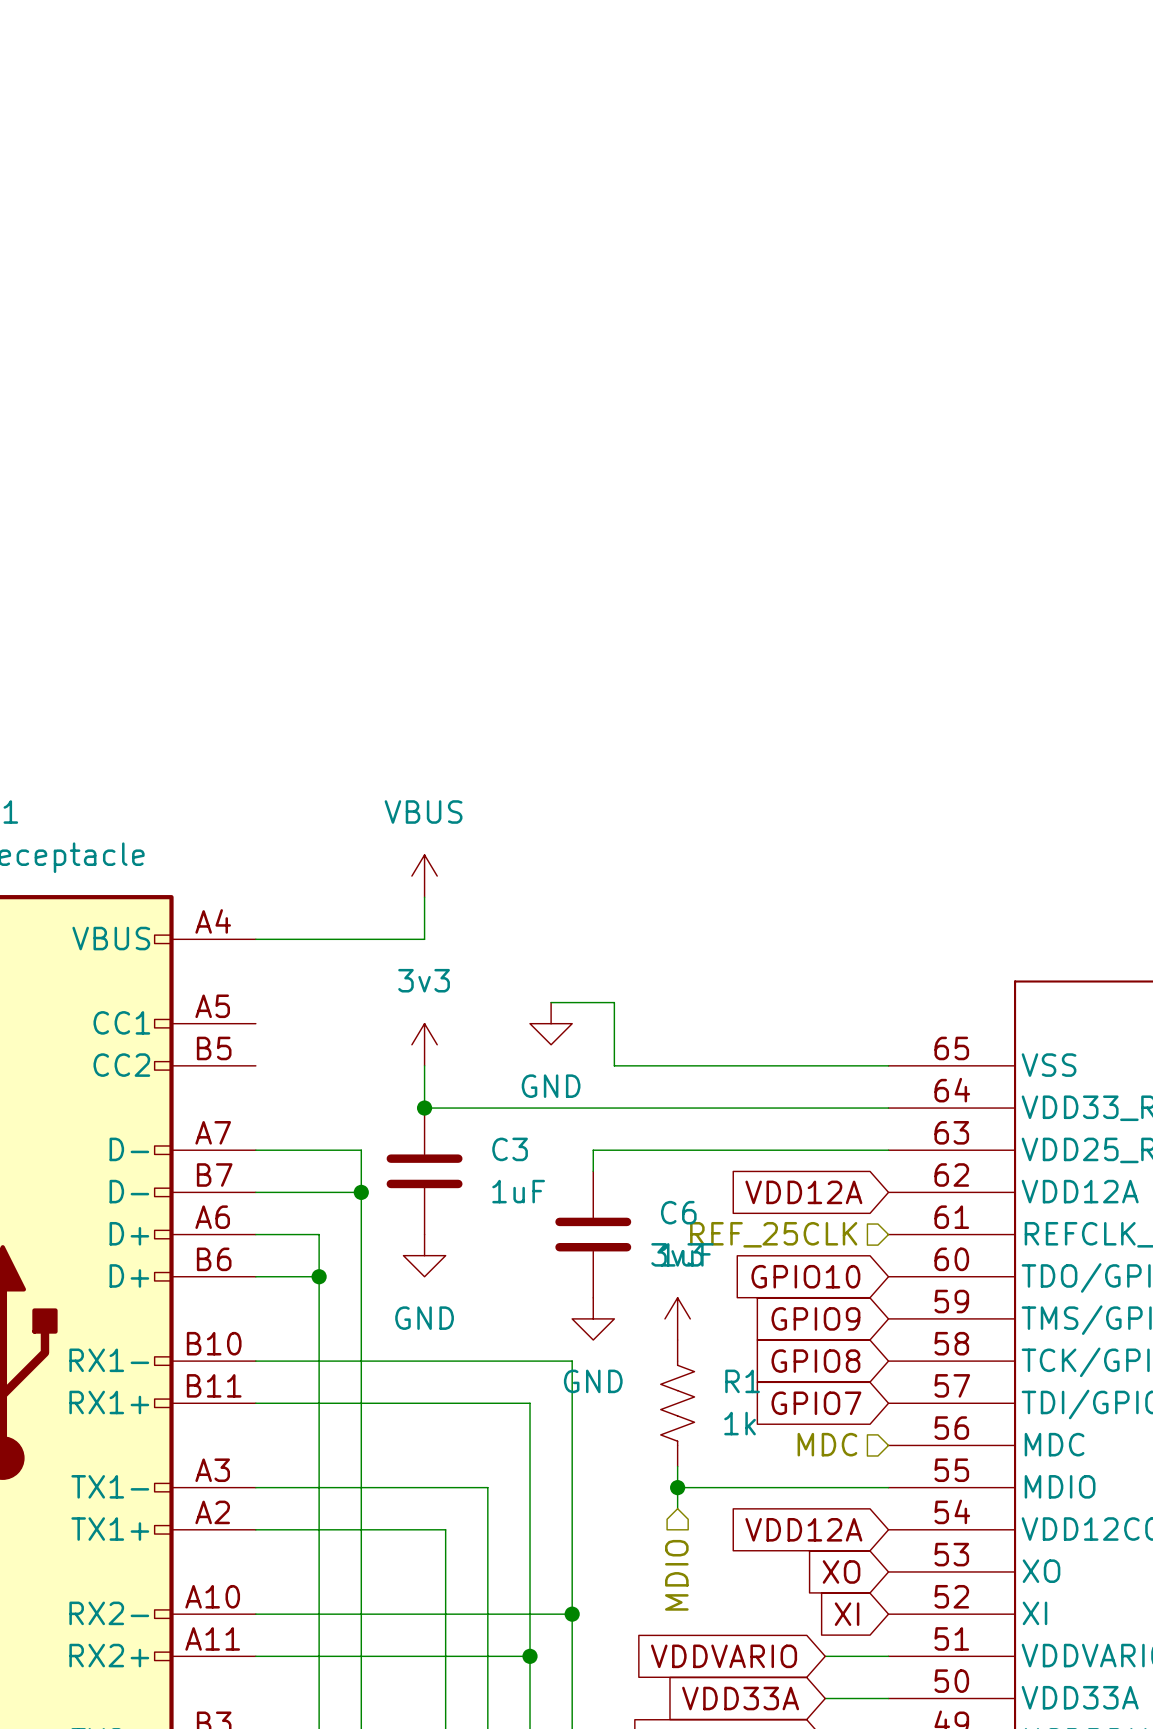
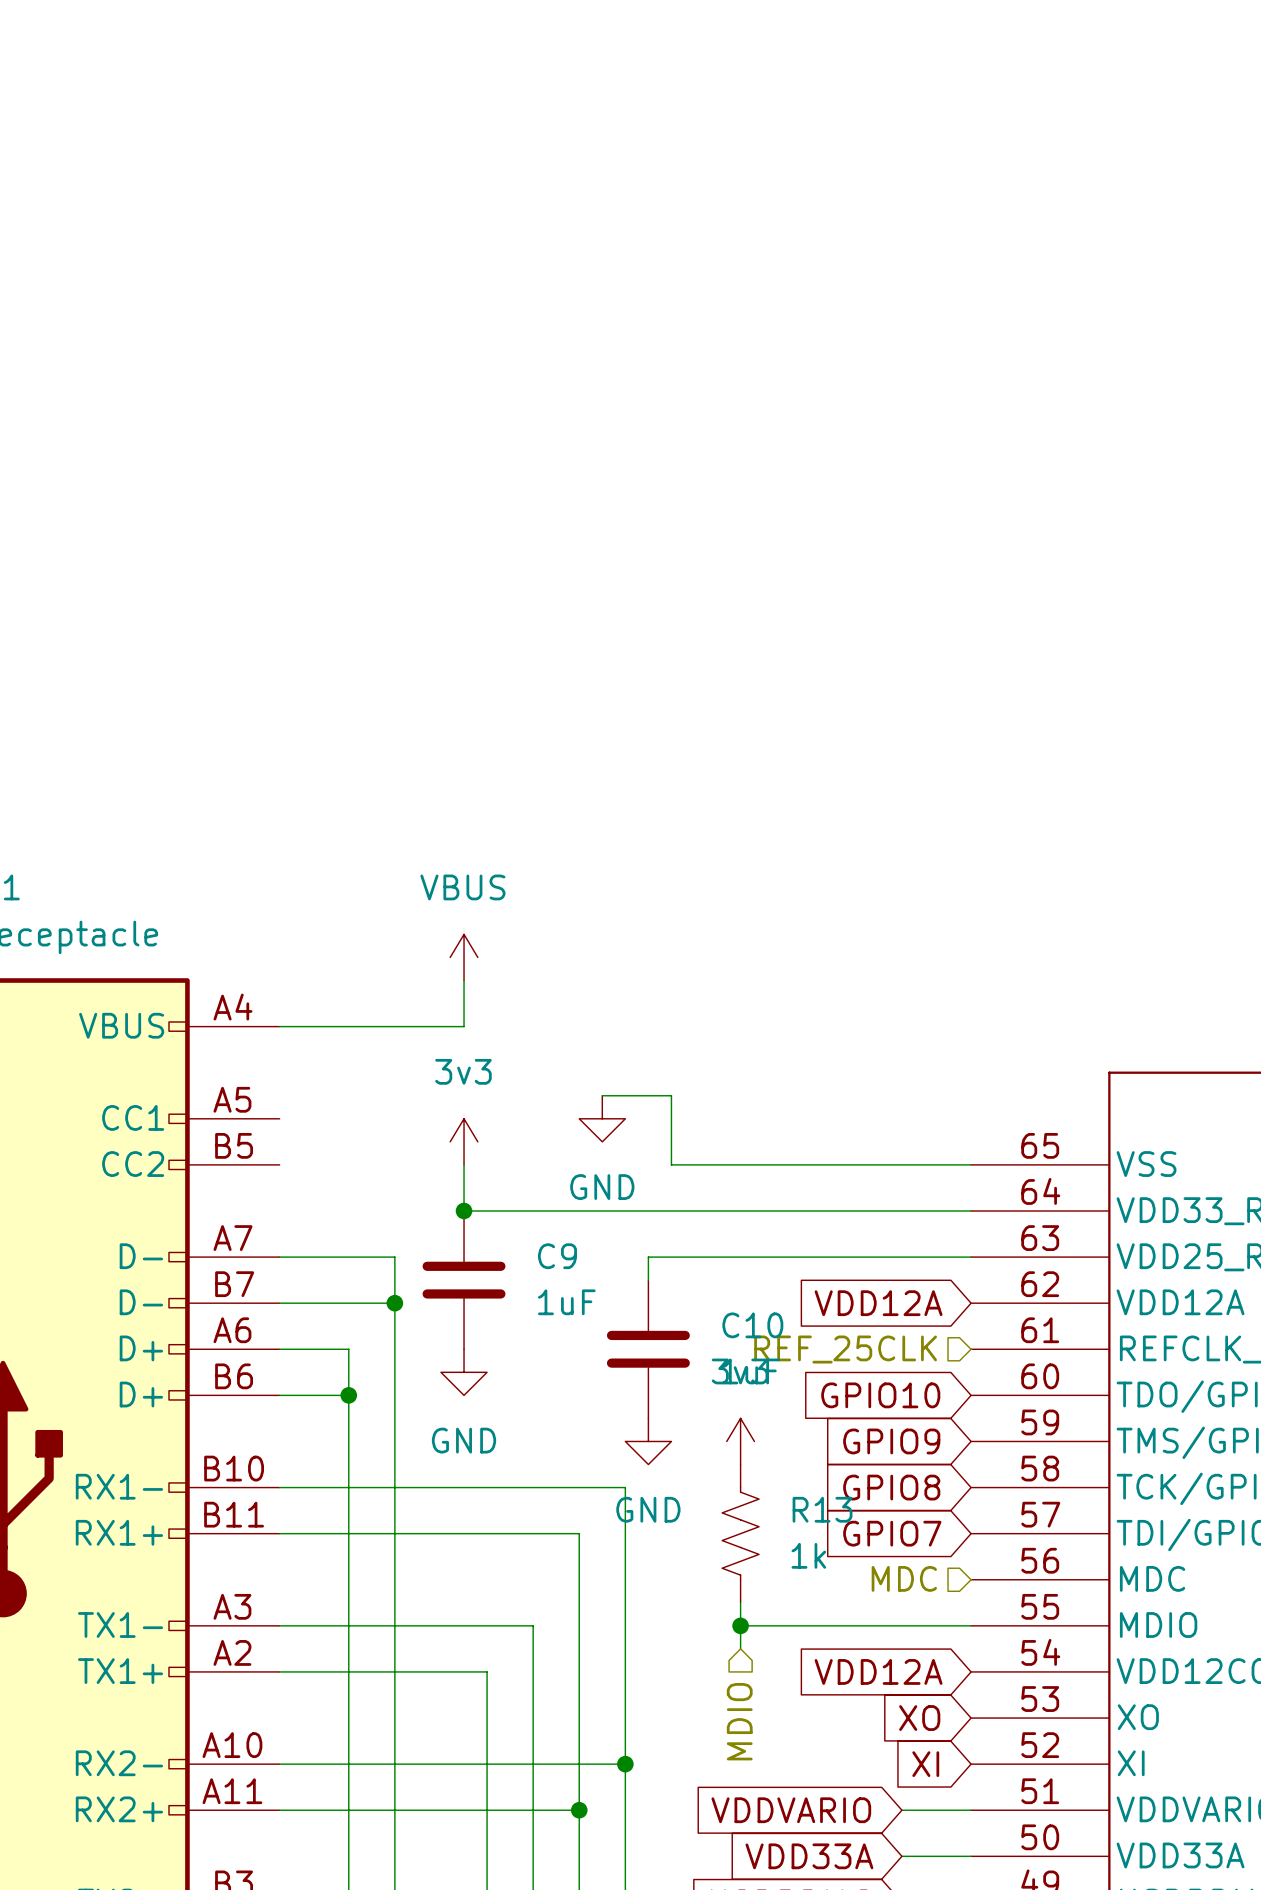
C3 name: C3 (510, 1149) -> C9 (557, 1256)
C6 name: C6 (678, 1212) -> C10 (752, 1325)
R1 name: R1 (742, 1381) -> R13 (822, 1509)

